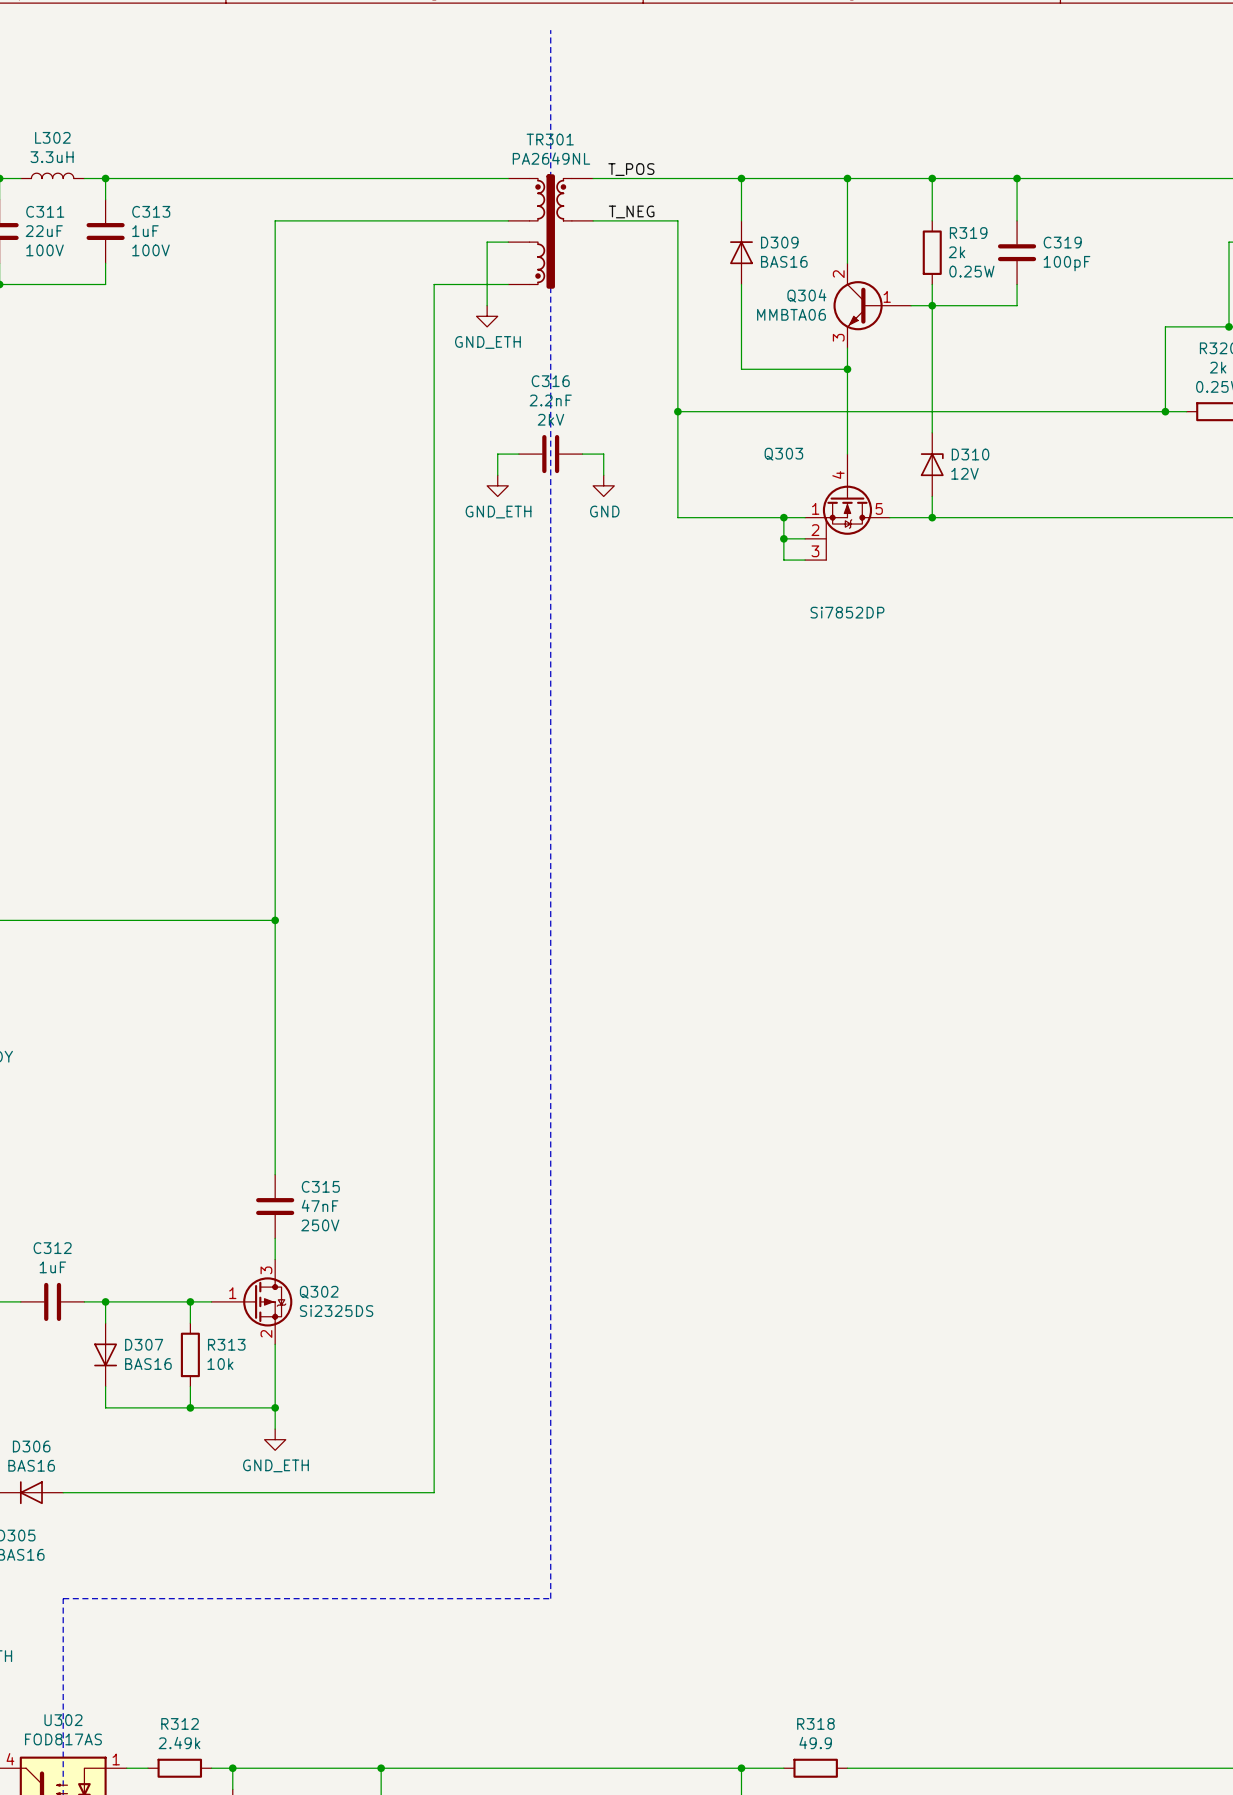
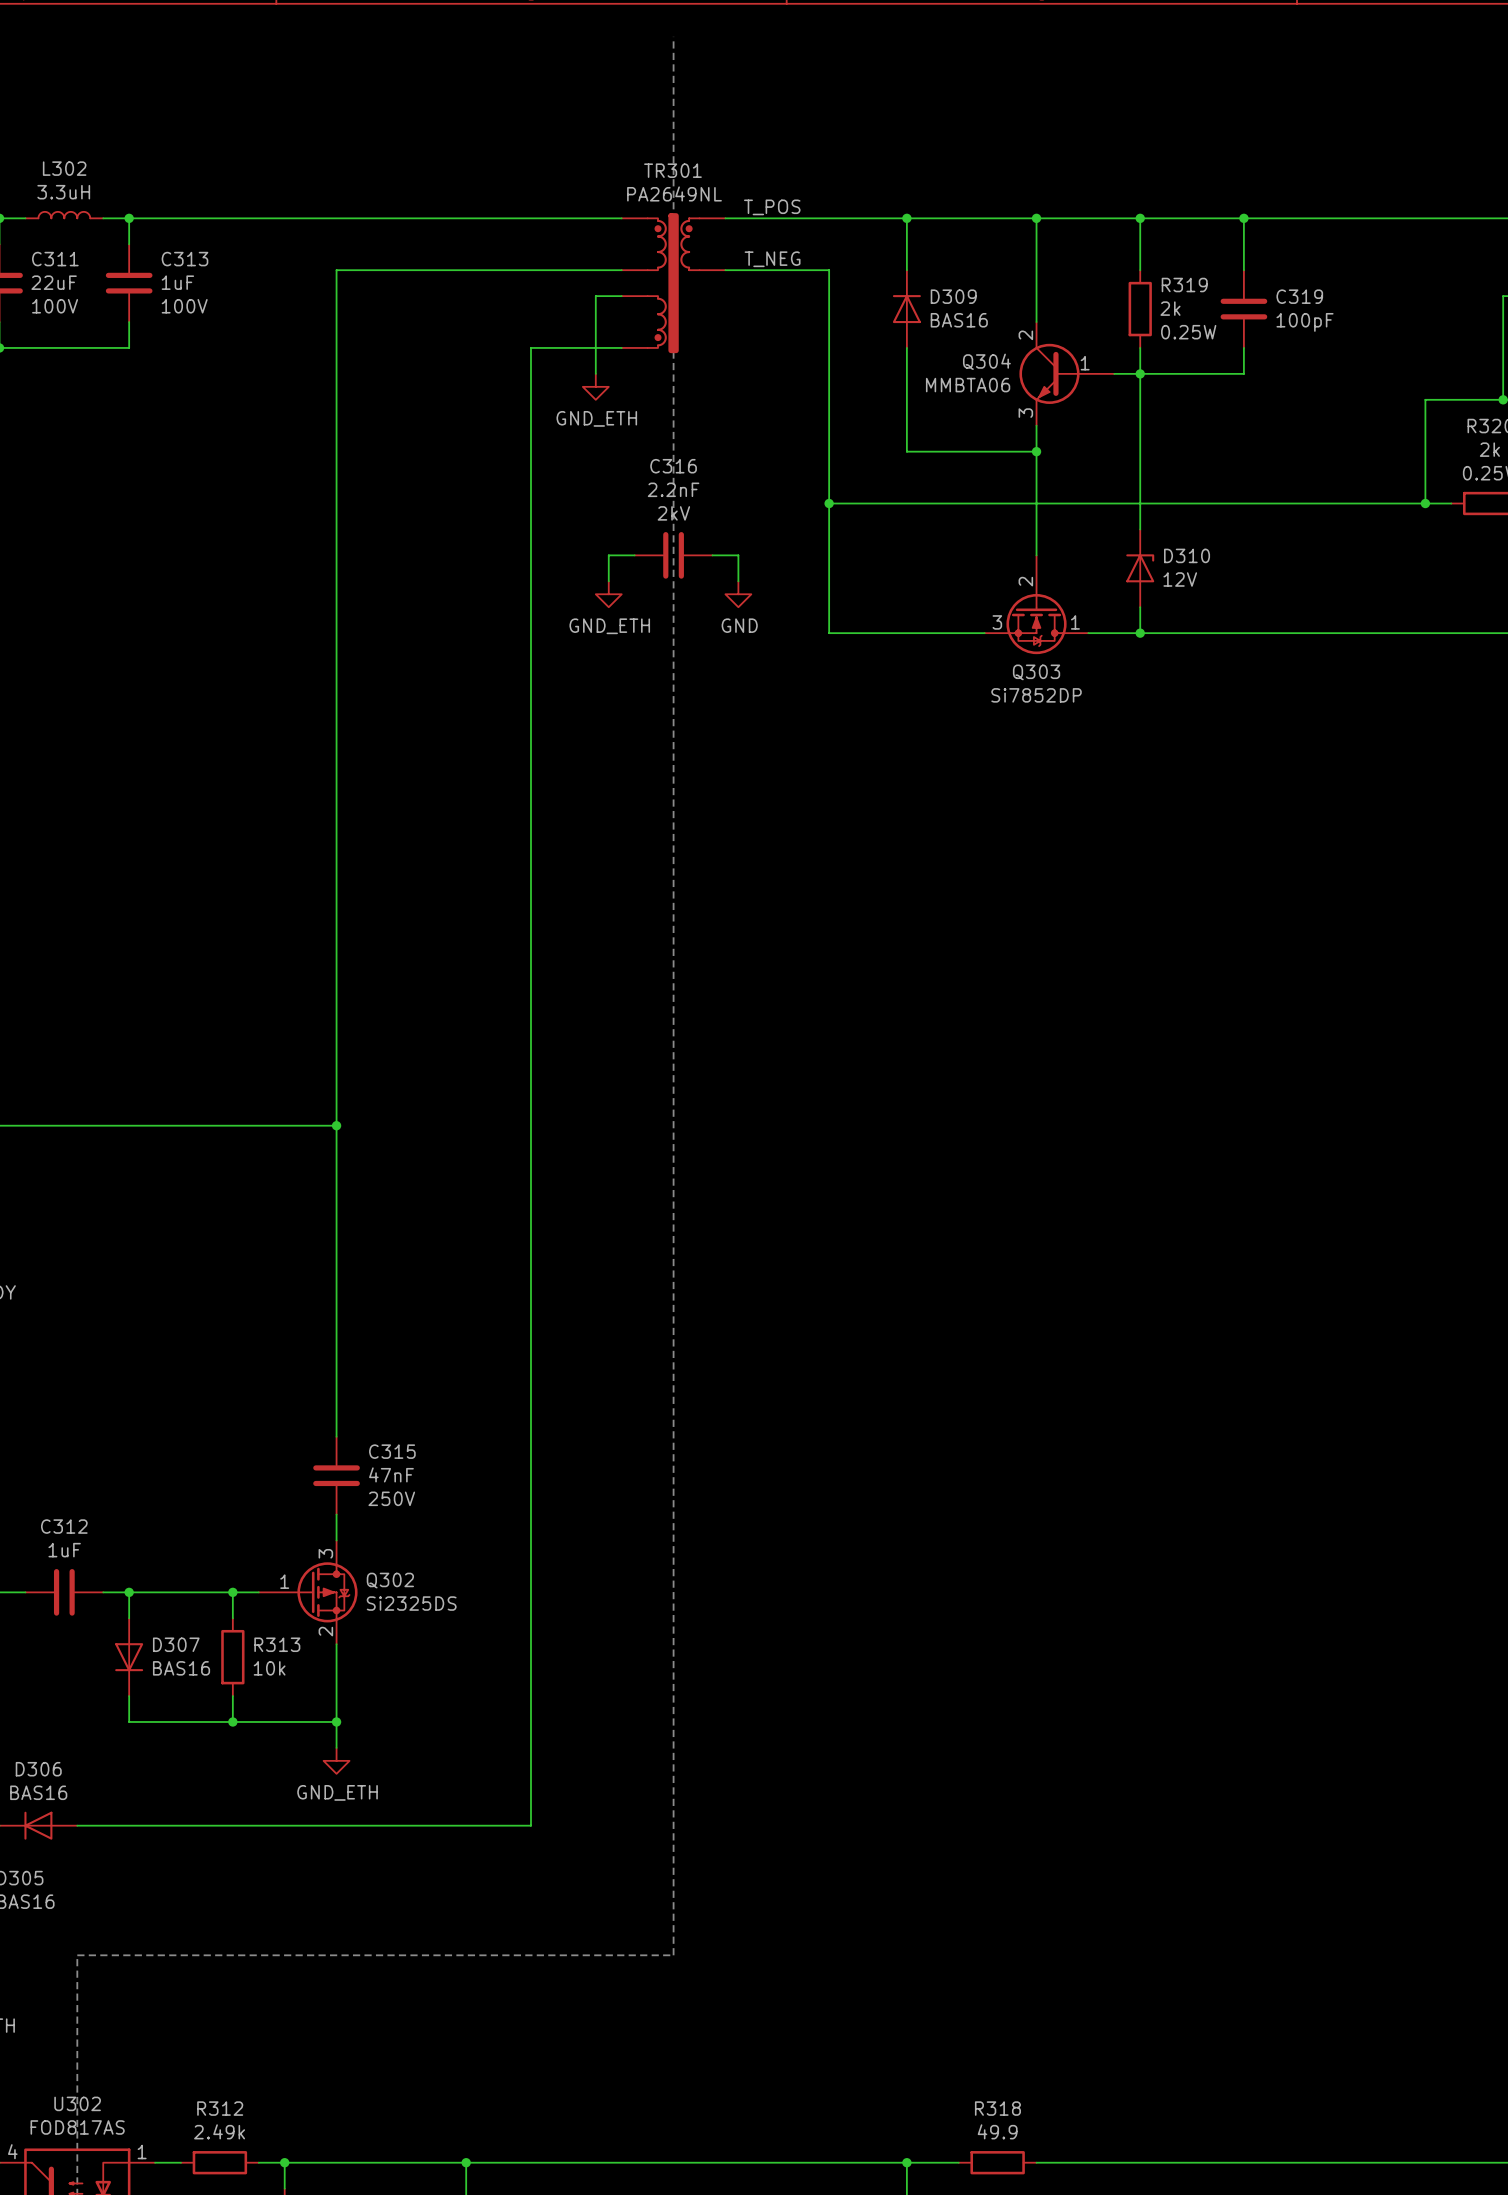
Q303 name position: Q303 (783, 454) -> Q303 (1036, 672)
Q303 symbol: [805, 454, 890, 561] -> [984, 555, 1089, 655]
wire: (783, 517) (783, 560) (805, 560) -> none
junction: (783, 517) -> none
wire: (783, 538) (805, 538) -> none
junction: (783, 538) -> none
Q303 value position: Si7852DP (847, 612) -> Si7852DP (1036, 695)

